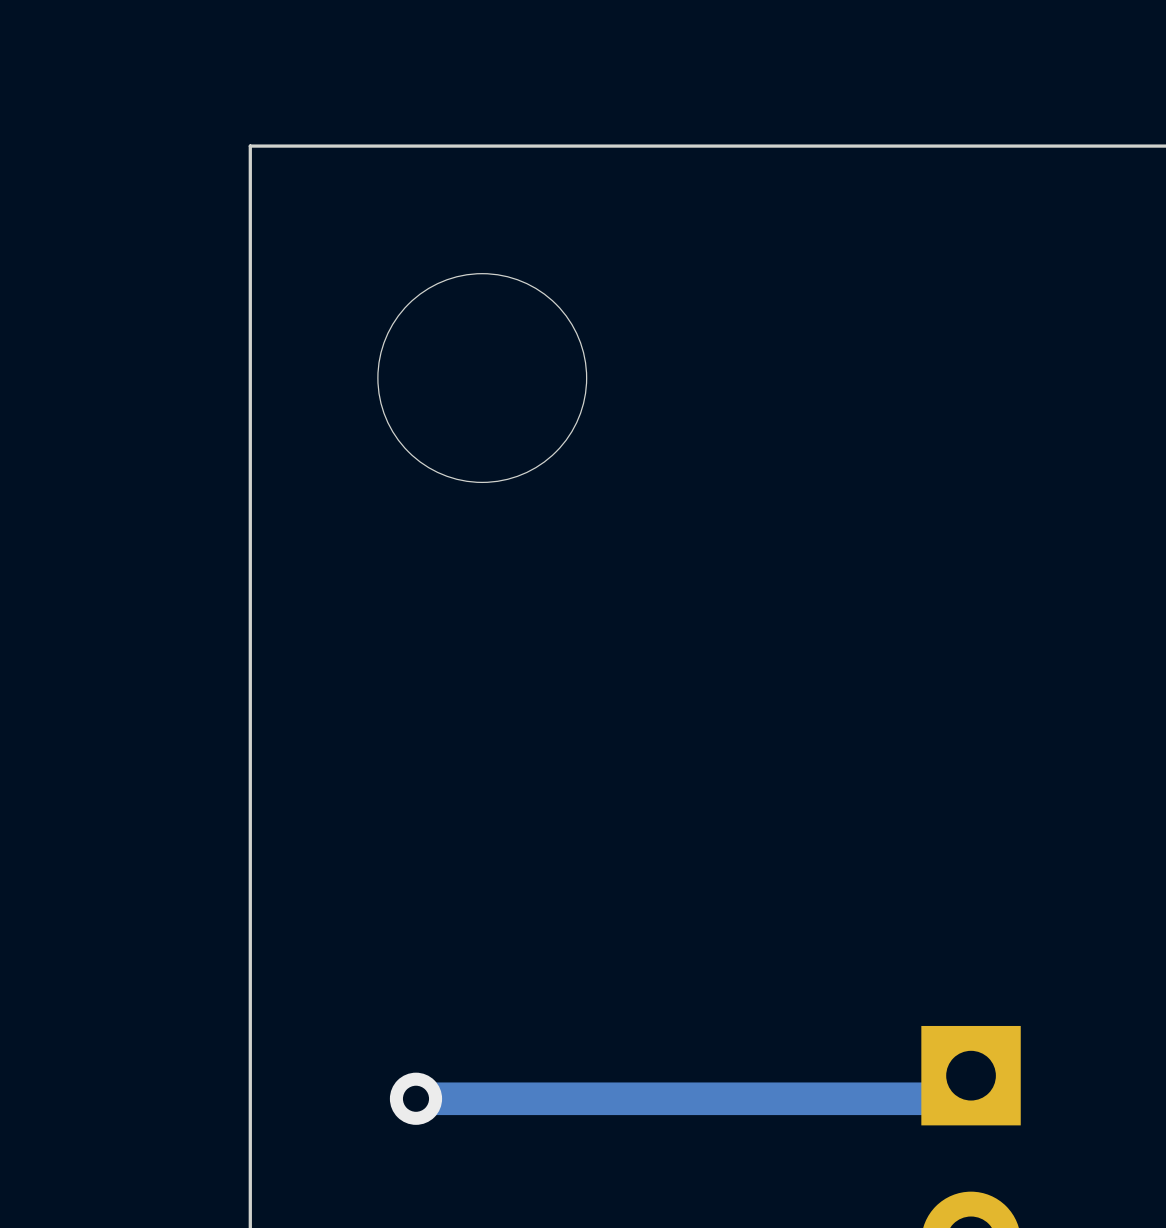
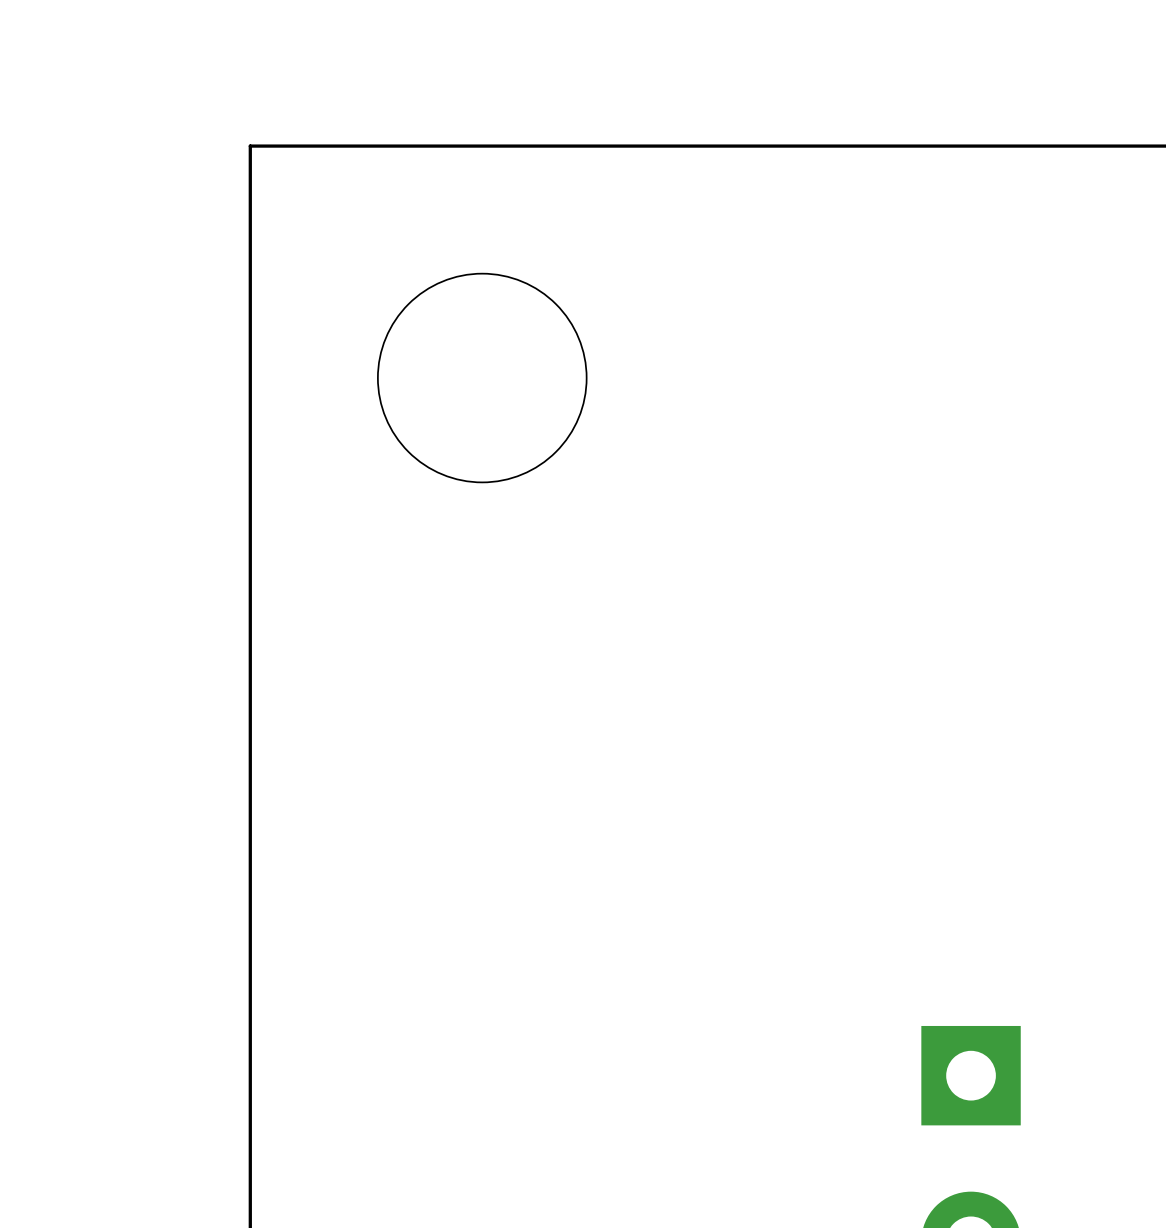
via: (415, 1098) -> none
track: (971, 1098) (415, 1098) -> none

